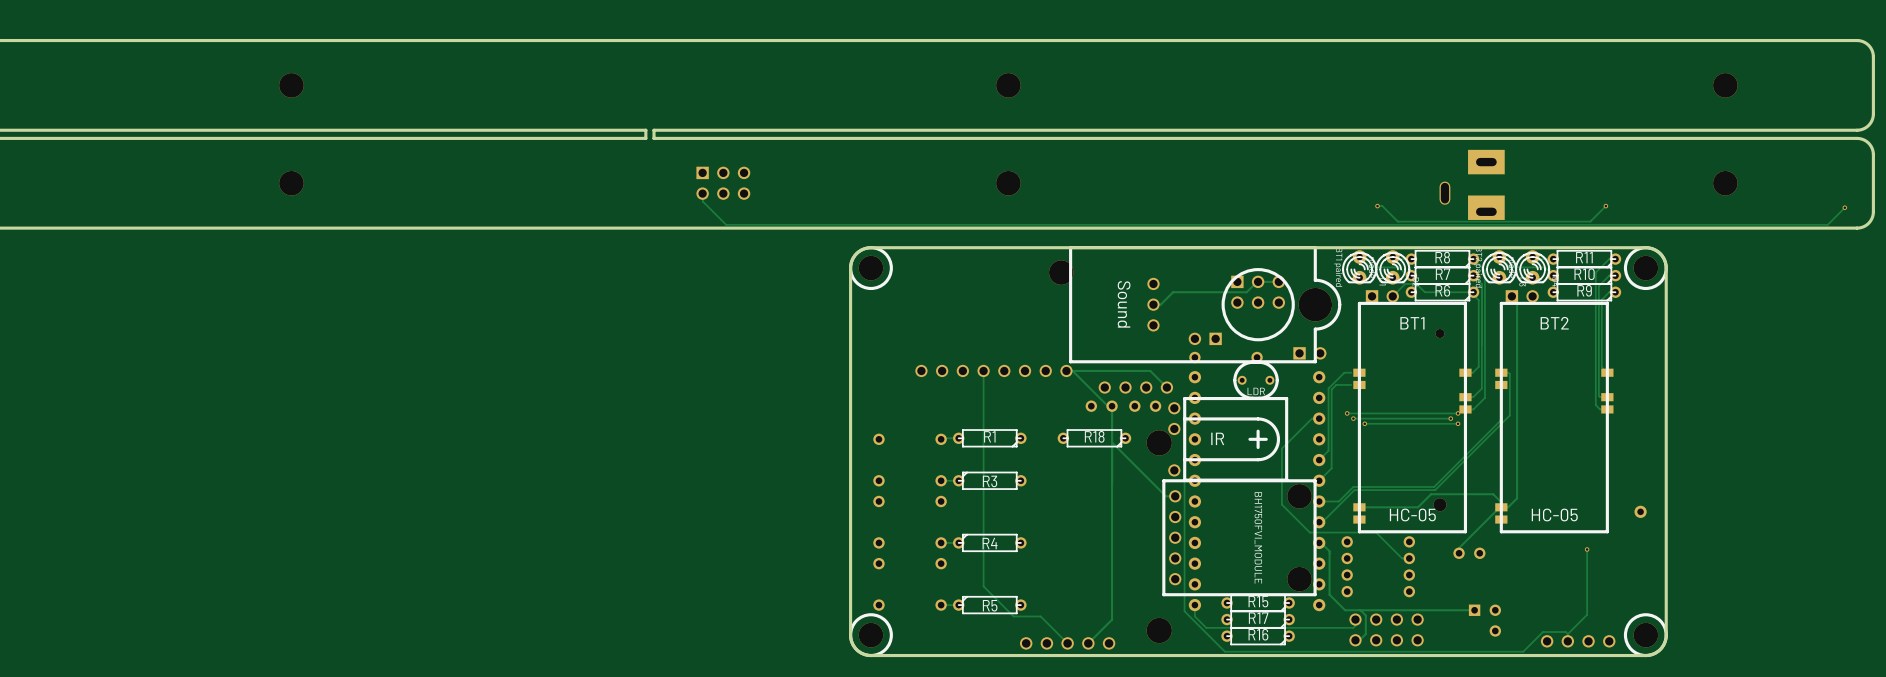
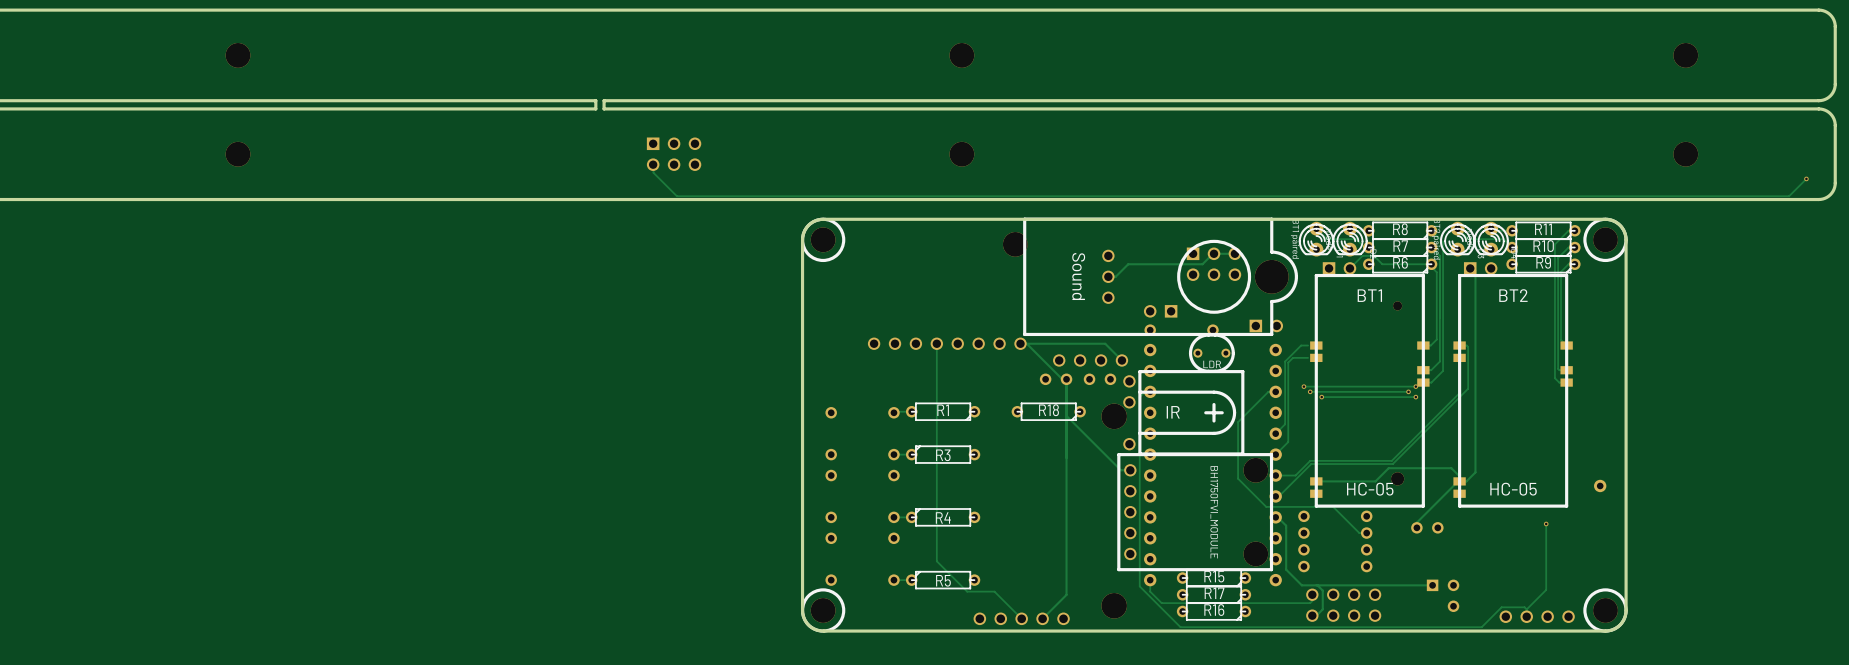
part: (1472, 184) -> none
via: (1377, 206) -> none
track: (1605, 206) (1590, 221) (1397, 221) (1382, 206) (1377, 206) -> none
via: (1605, 206) -> none

